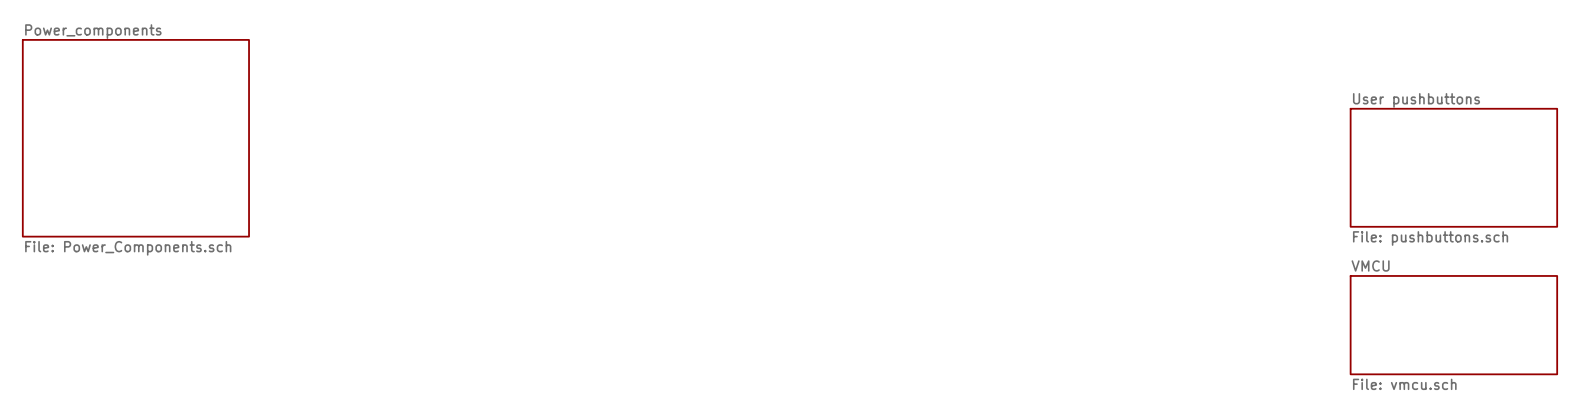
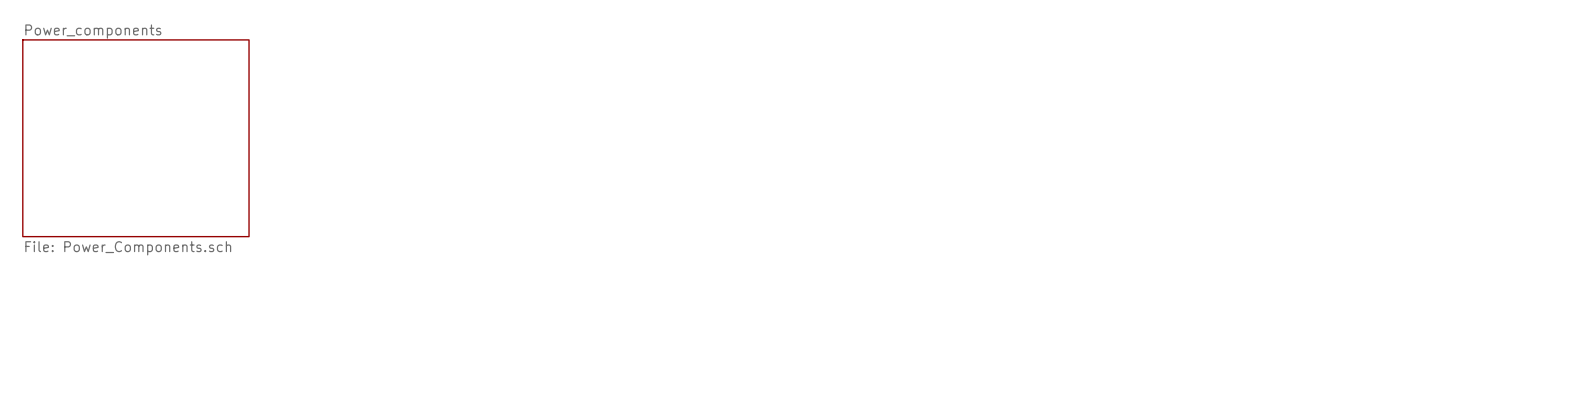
sheet User pushbuttons: File: pushbuttons.sch (1453, 167) -> none
sheet VMCU: File: vmcu.sch (1453, 325) -> none

